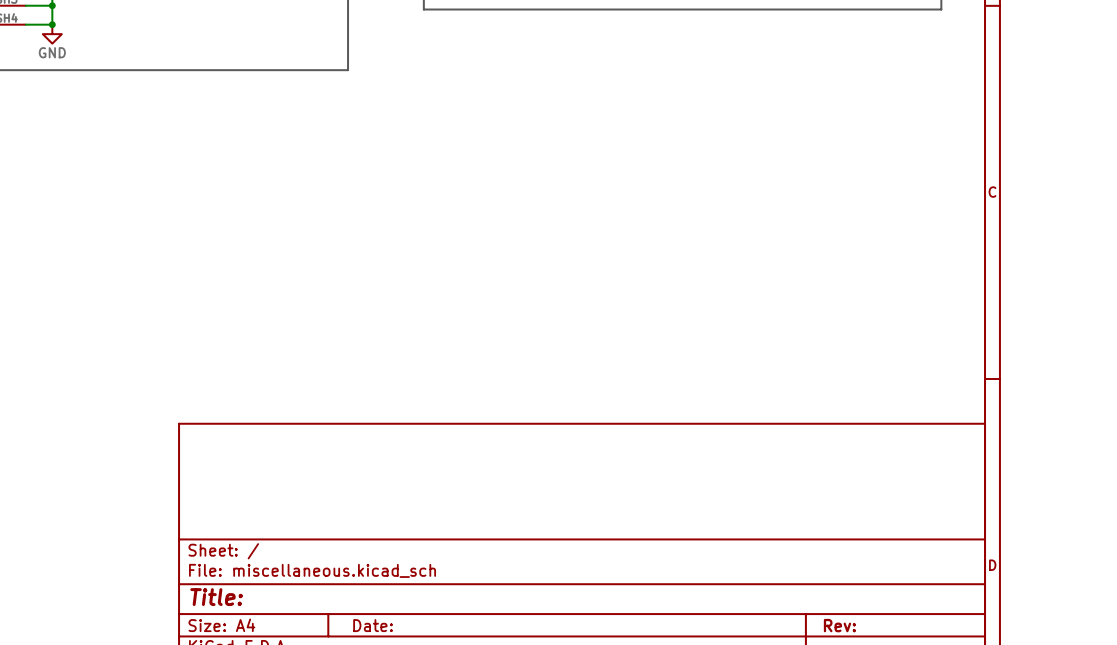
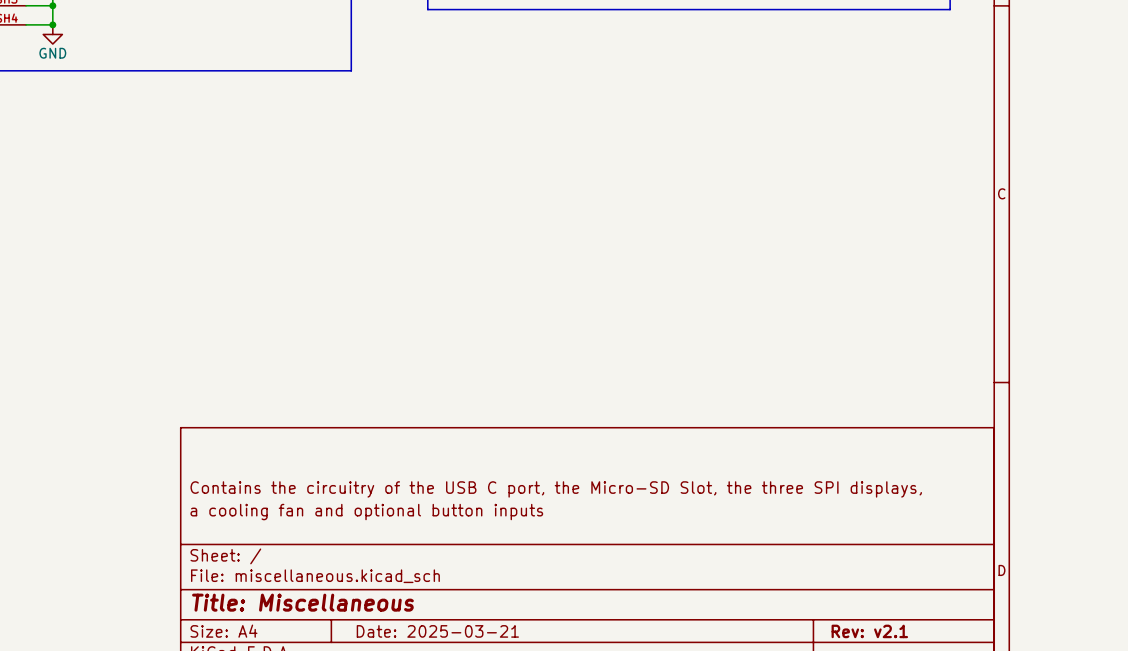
title block: none -> Contains the circuitry of the USB C port, the Micro-SD Slot, the three SPI displays, (556, 489)
title block: none -> a cooling fan and optional button inputs (366, 512)
title block: Title: (216, 597) -> Title: Miscellaneous (302, 602)
title block: Date: (373, 625) -> Date: 2025-03-21 (437, 631)
title block: Rev: (839, 625) -> Rev: v2.1 (869, 631)

